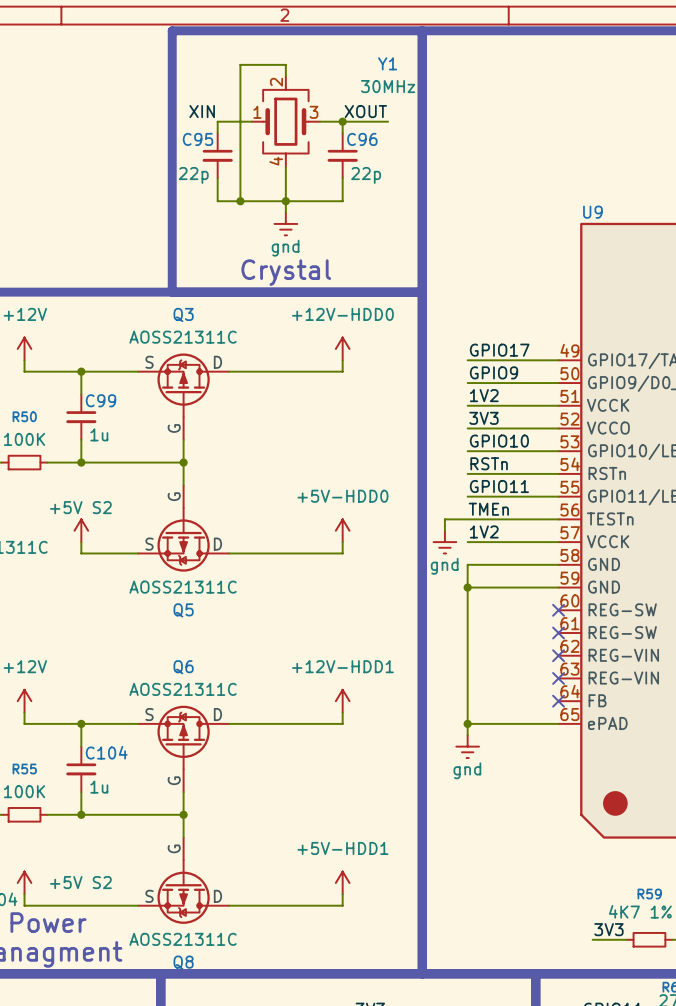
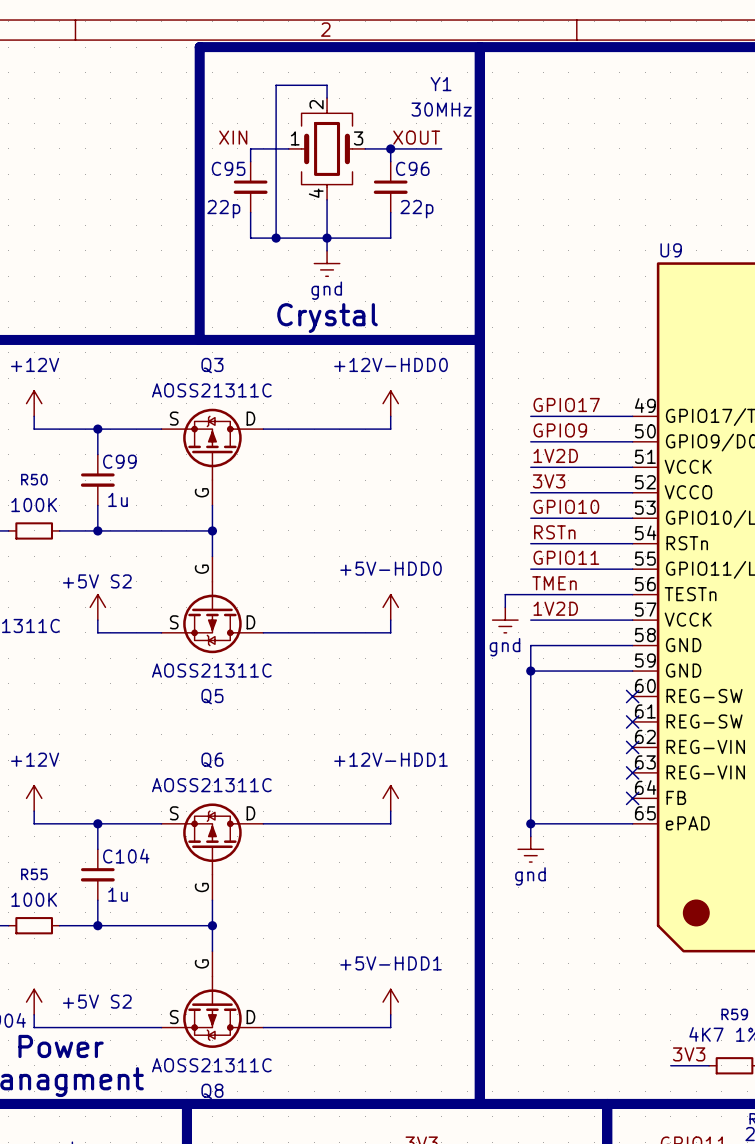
label: 1V2 (484, 395) -> 1V2D (555, 455)
label: 1V2 (484, 531) -> 1V2D (555, 608)

